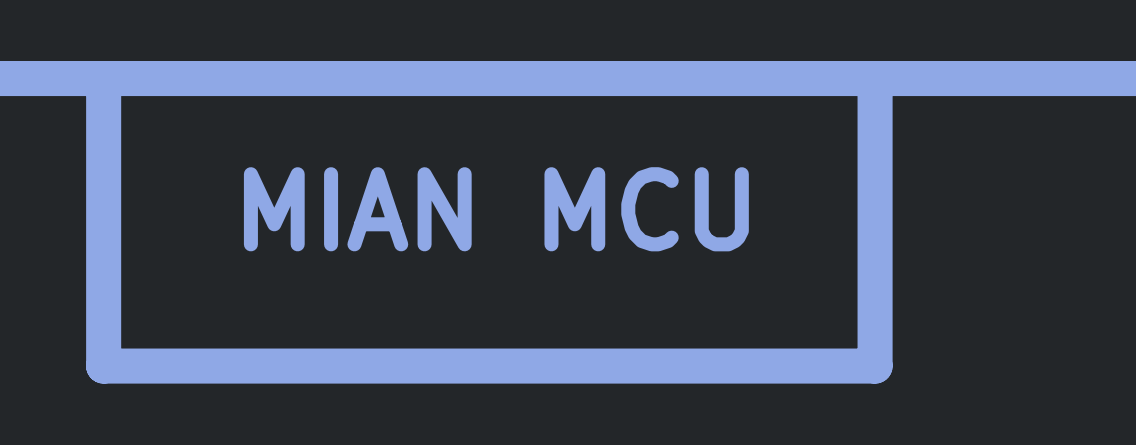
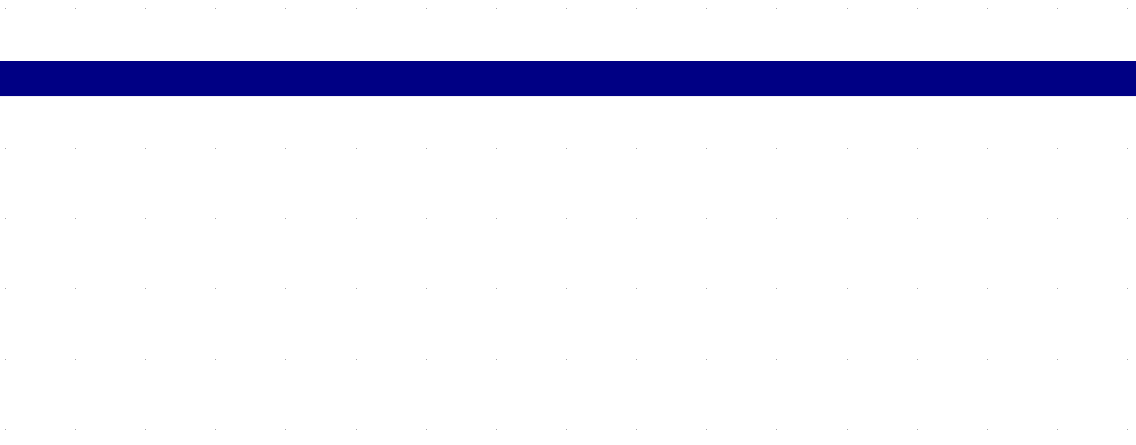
line: (103, 85) (103, 366) (875, 366) (875, 85) -> none
text: MIAN MCU (496, 209) -> none

